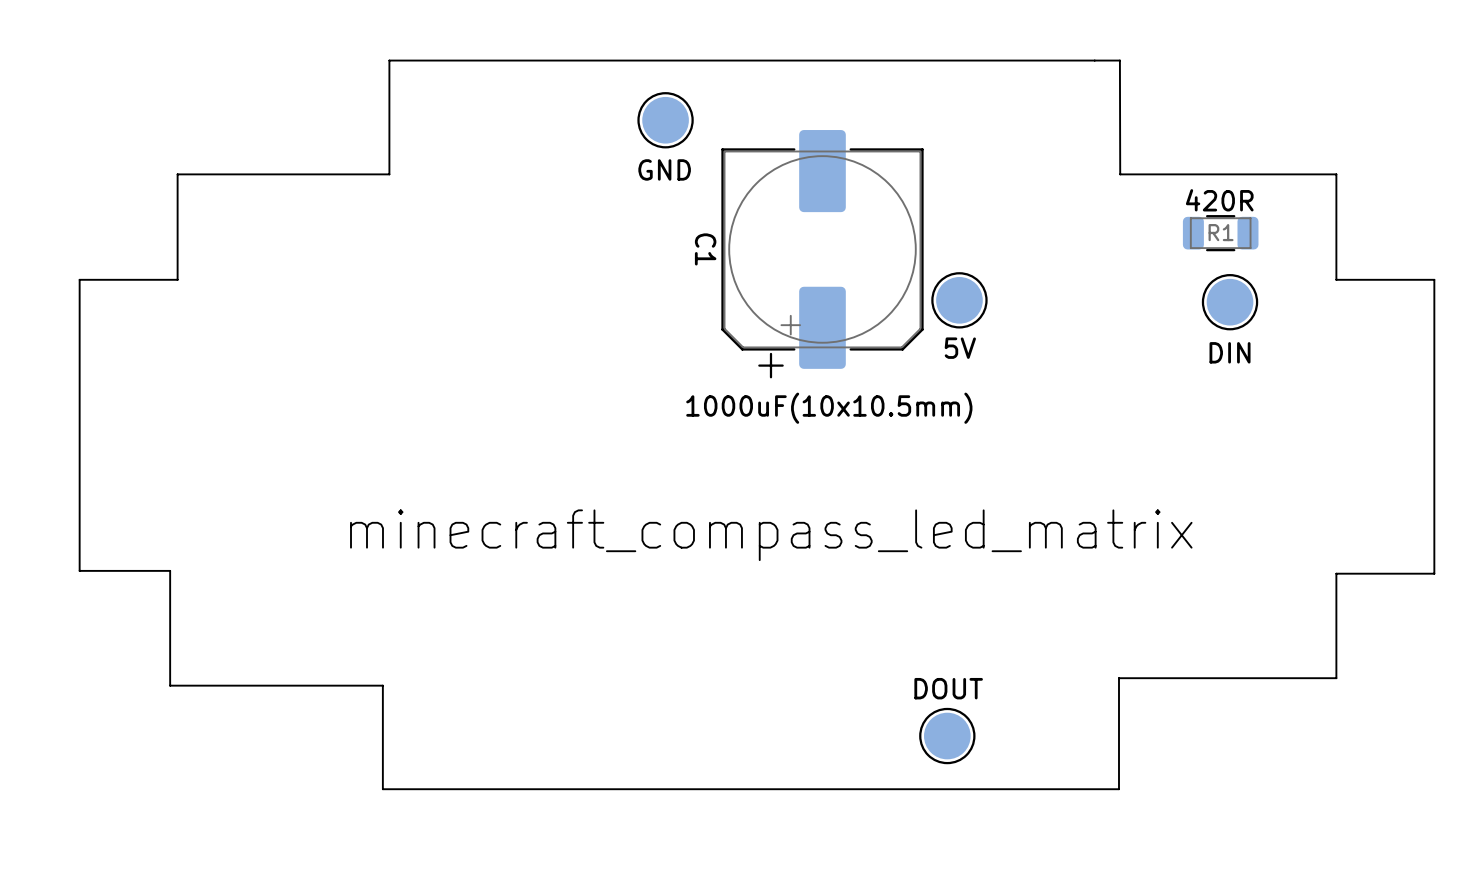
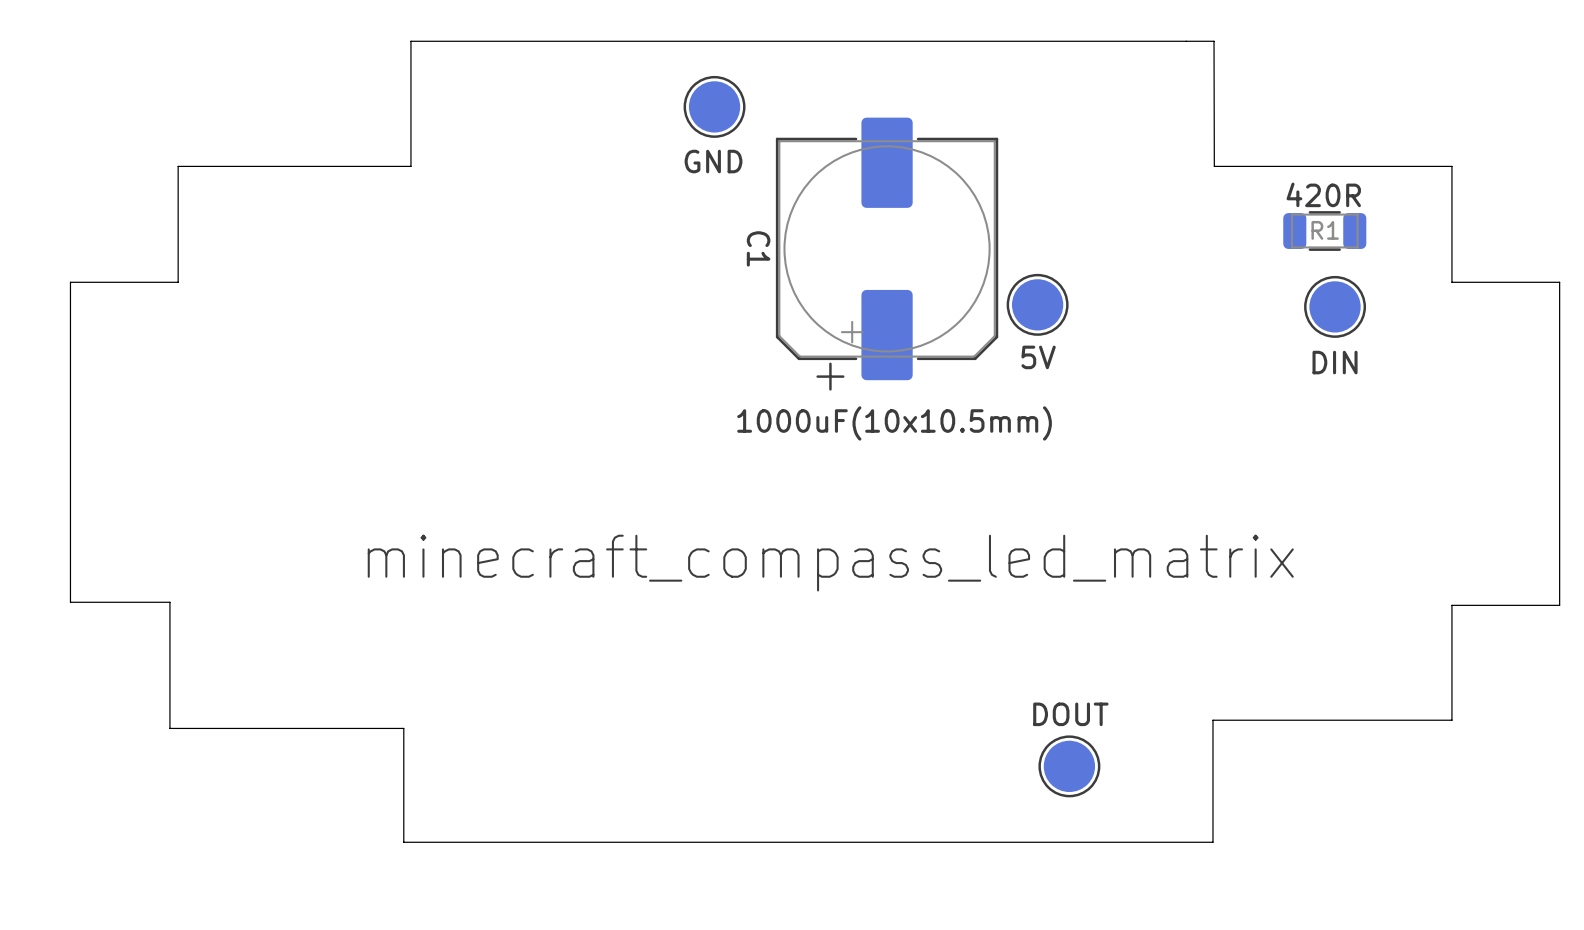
part position: (947, 736) -> (1069, 766)

